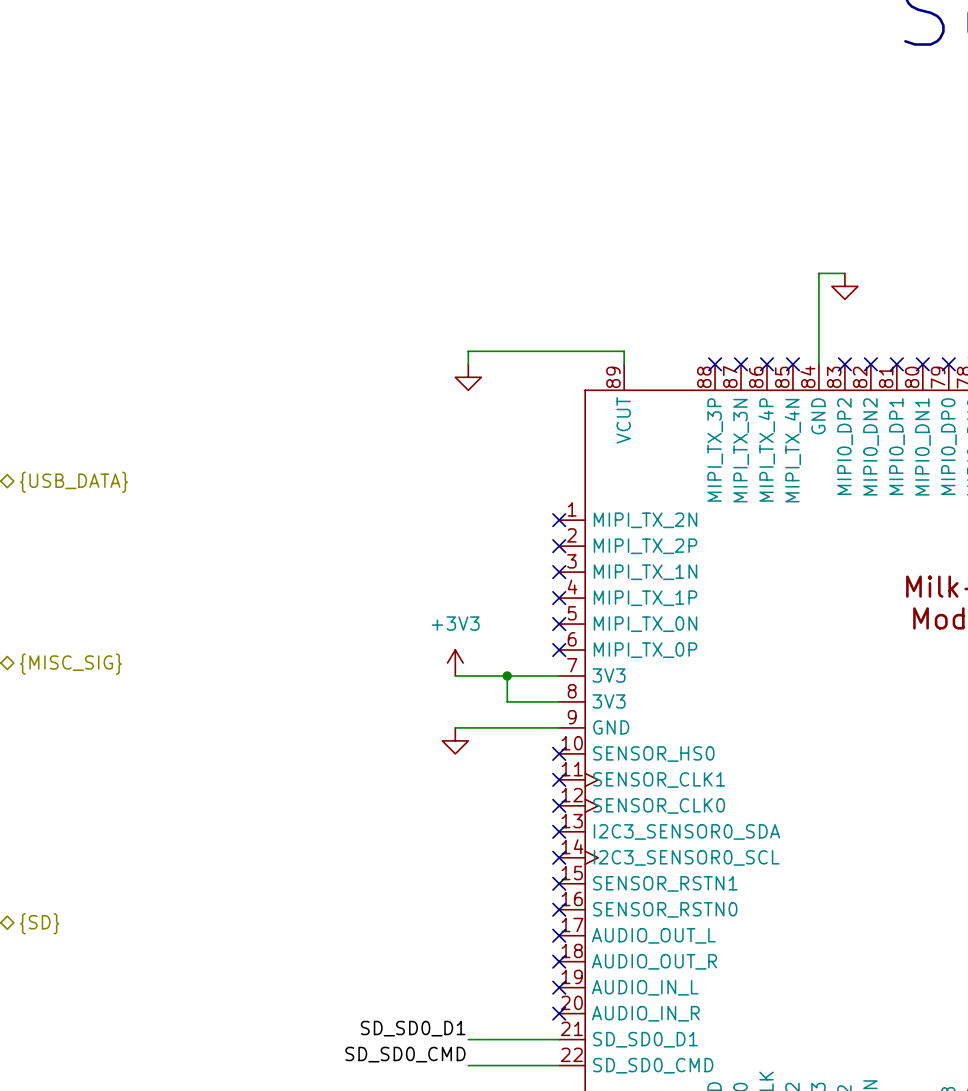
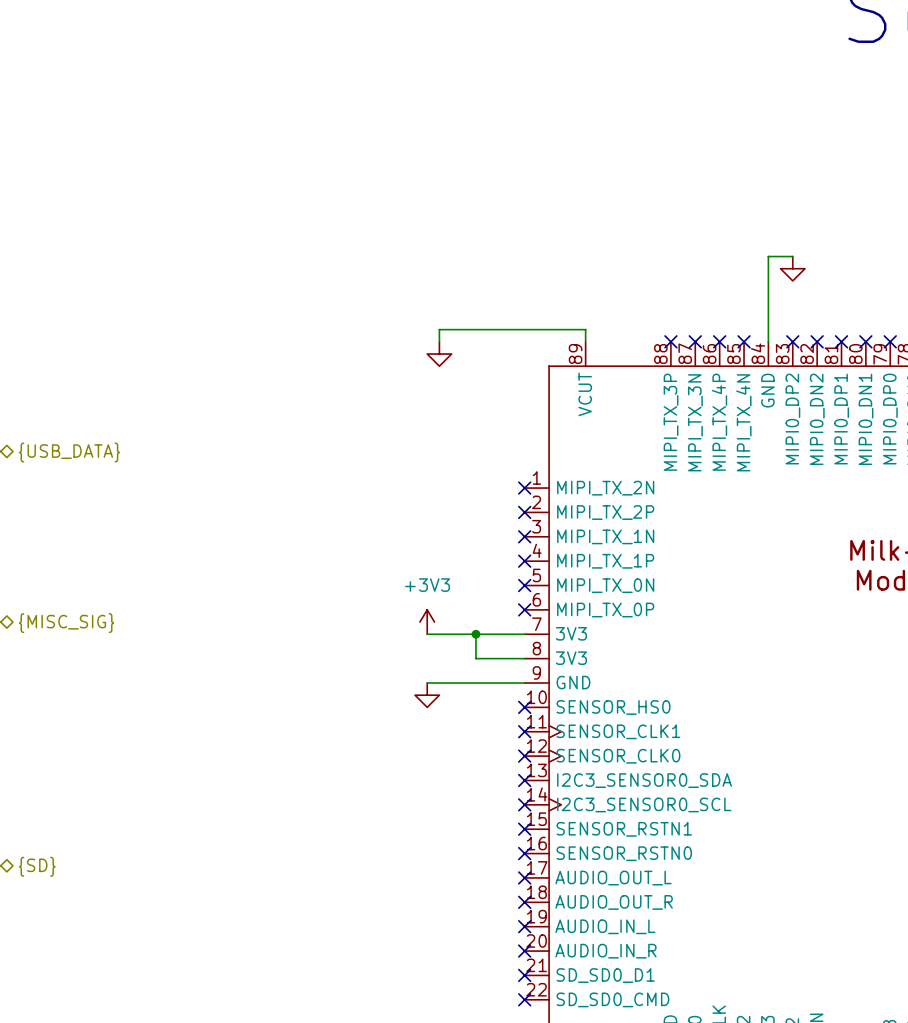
label: SD_SD0_D1 (413, 1028) -> none
wire: (468, 1039) (559, 1039) -> none
no-connect mark: none -> (524, 975)
label: SD_SD0_CMD (405, 1054) -> none
wire: (468, 1065) (559, 1065) -> none
no-connect mark: none -> (524, 999)

